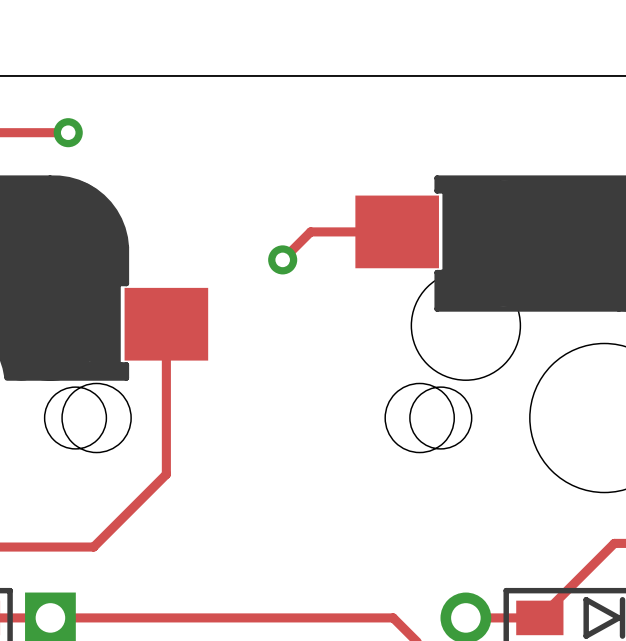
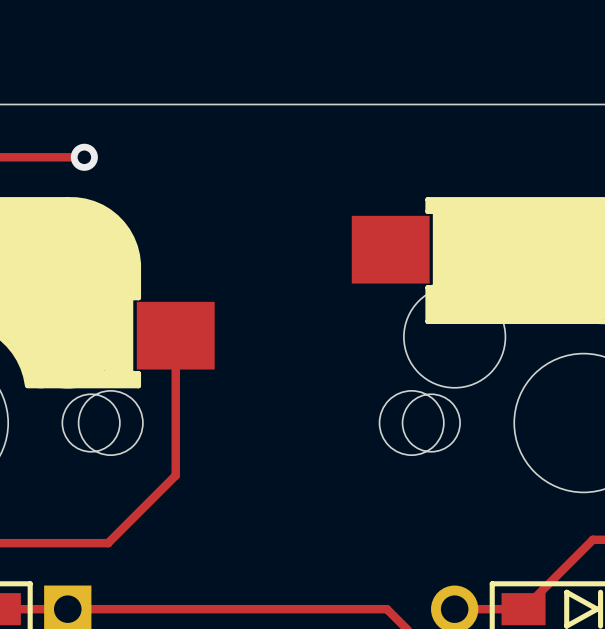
track: (397, 231) (310, 231) (282, 259) -> none
via: (282, 259) -> none

